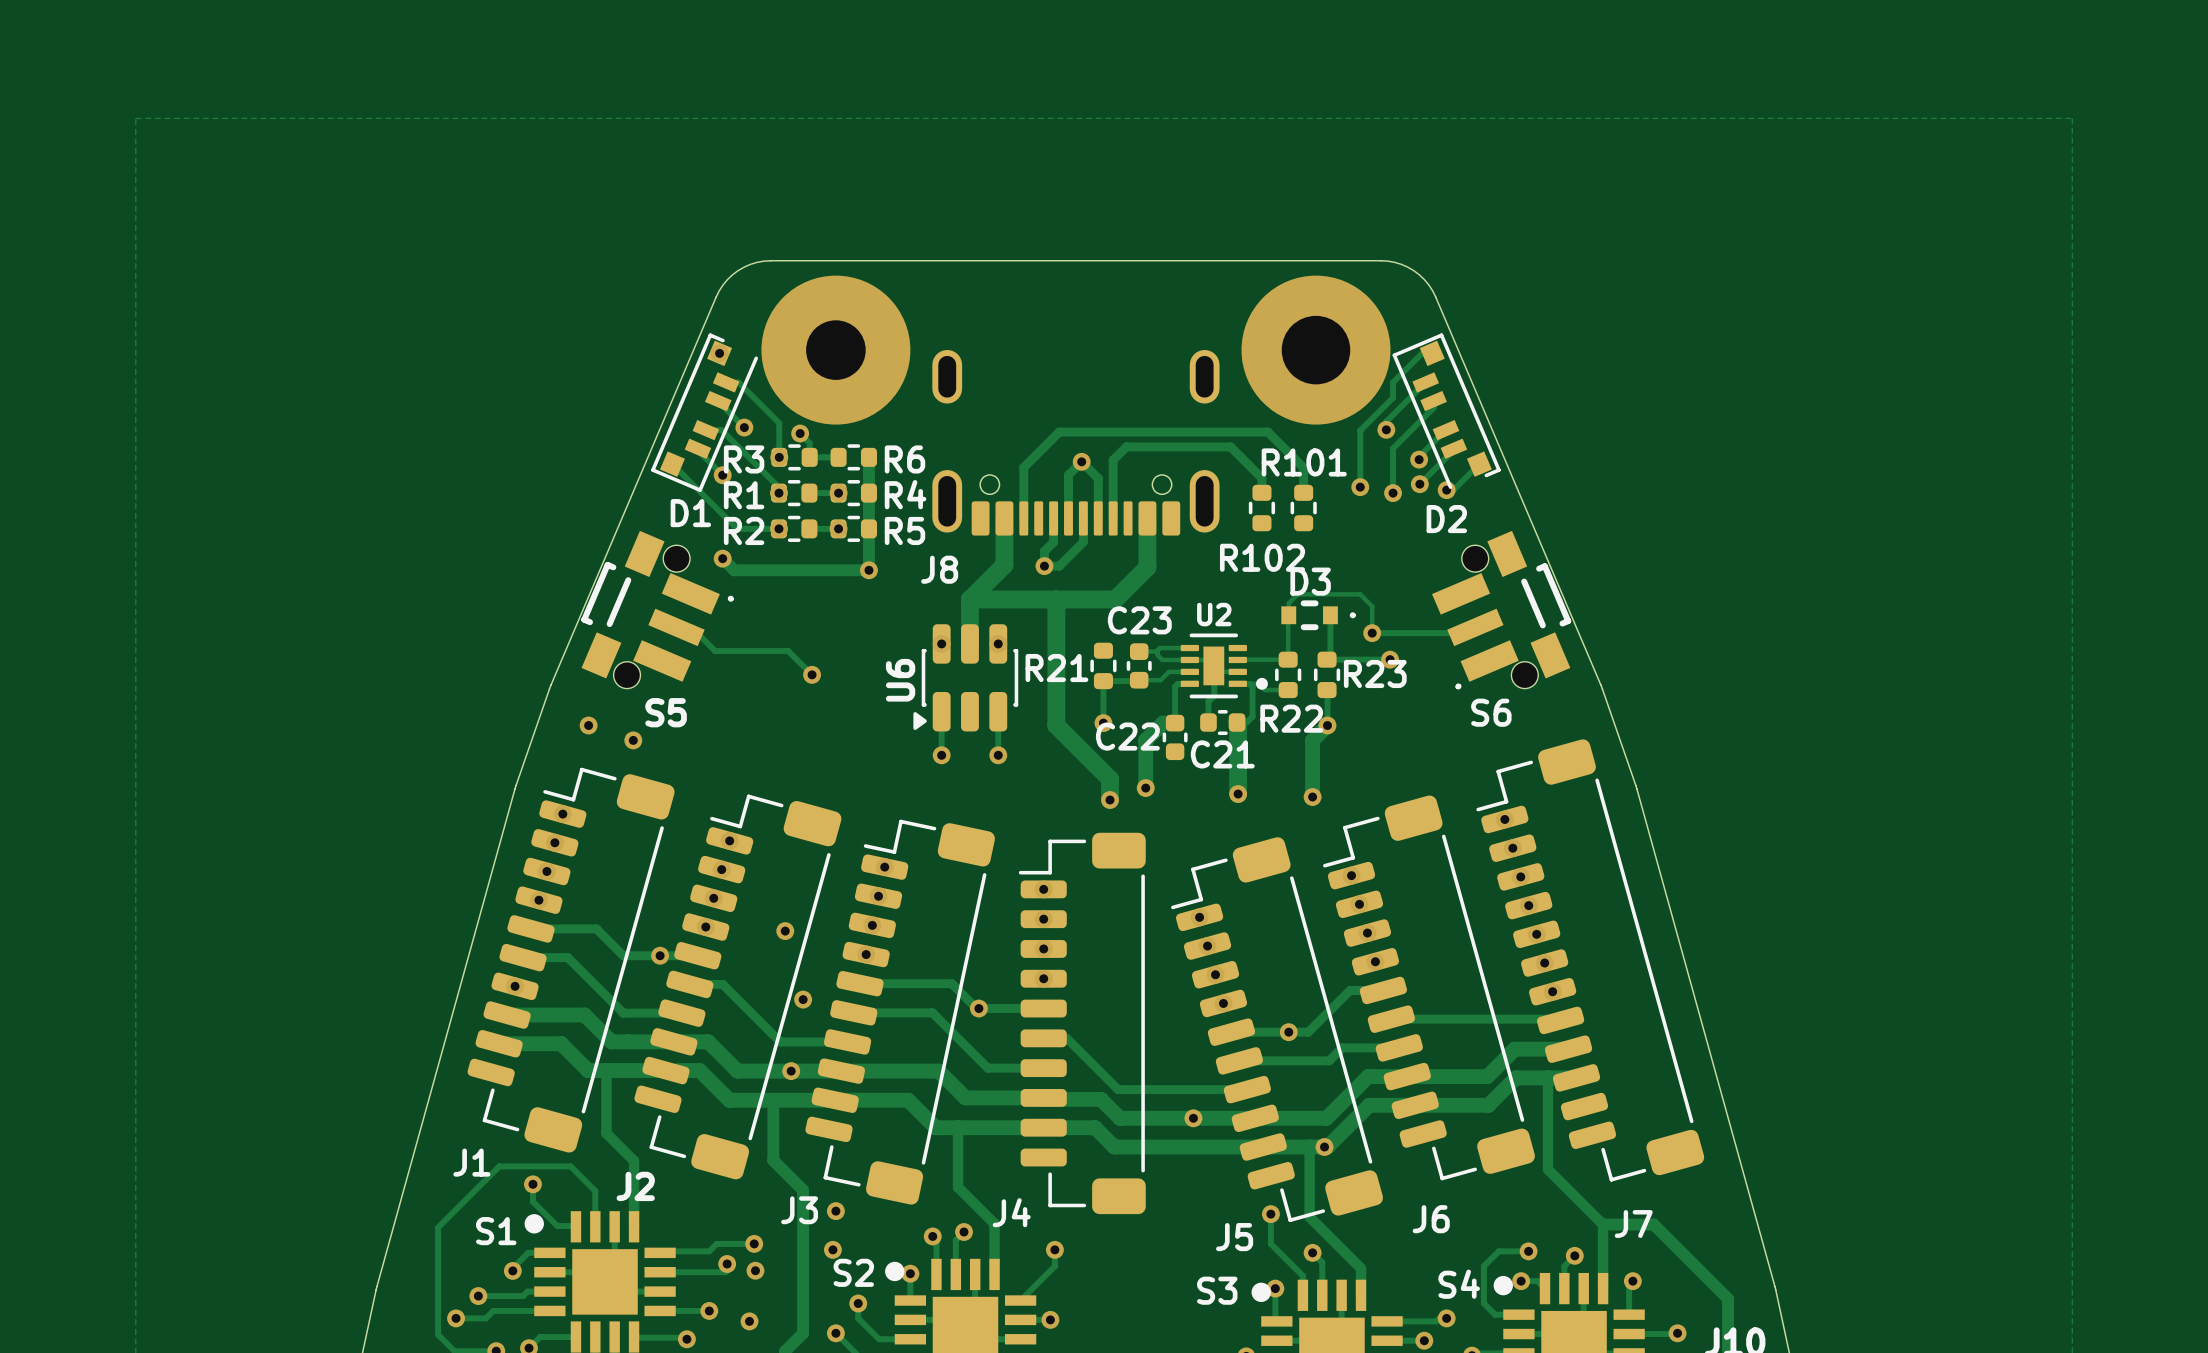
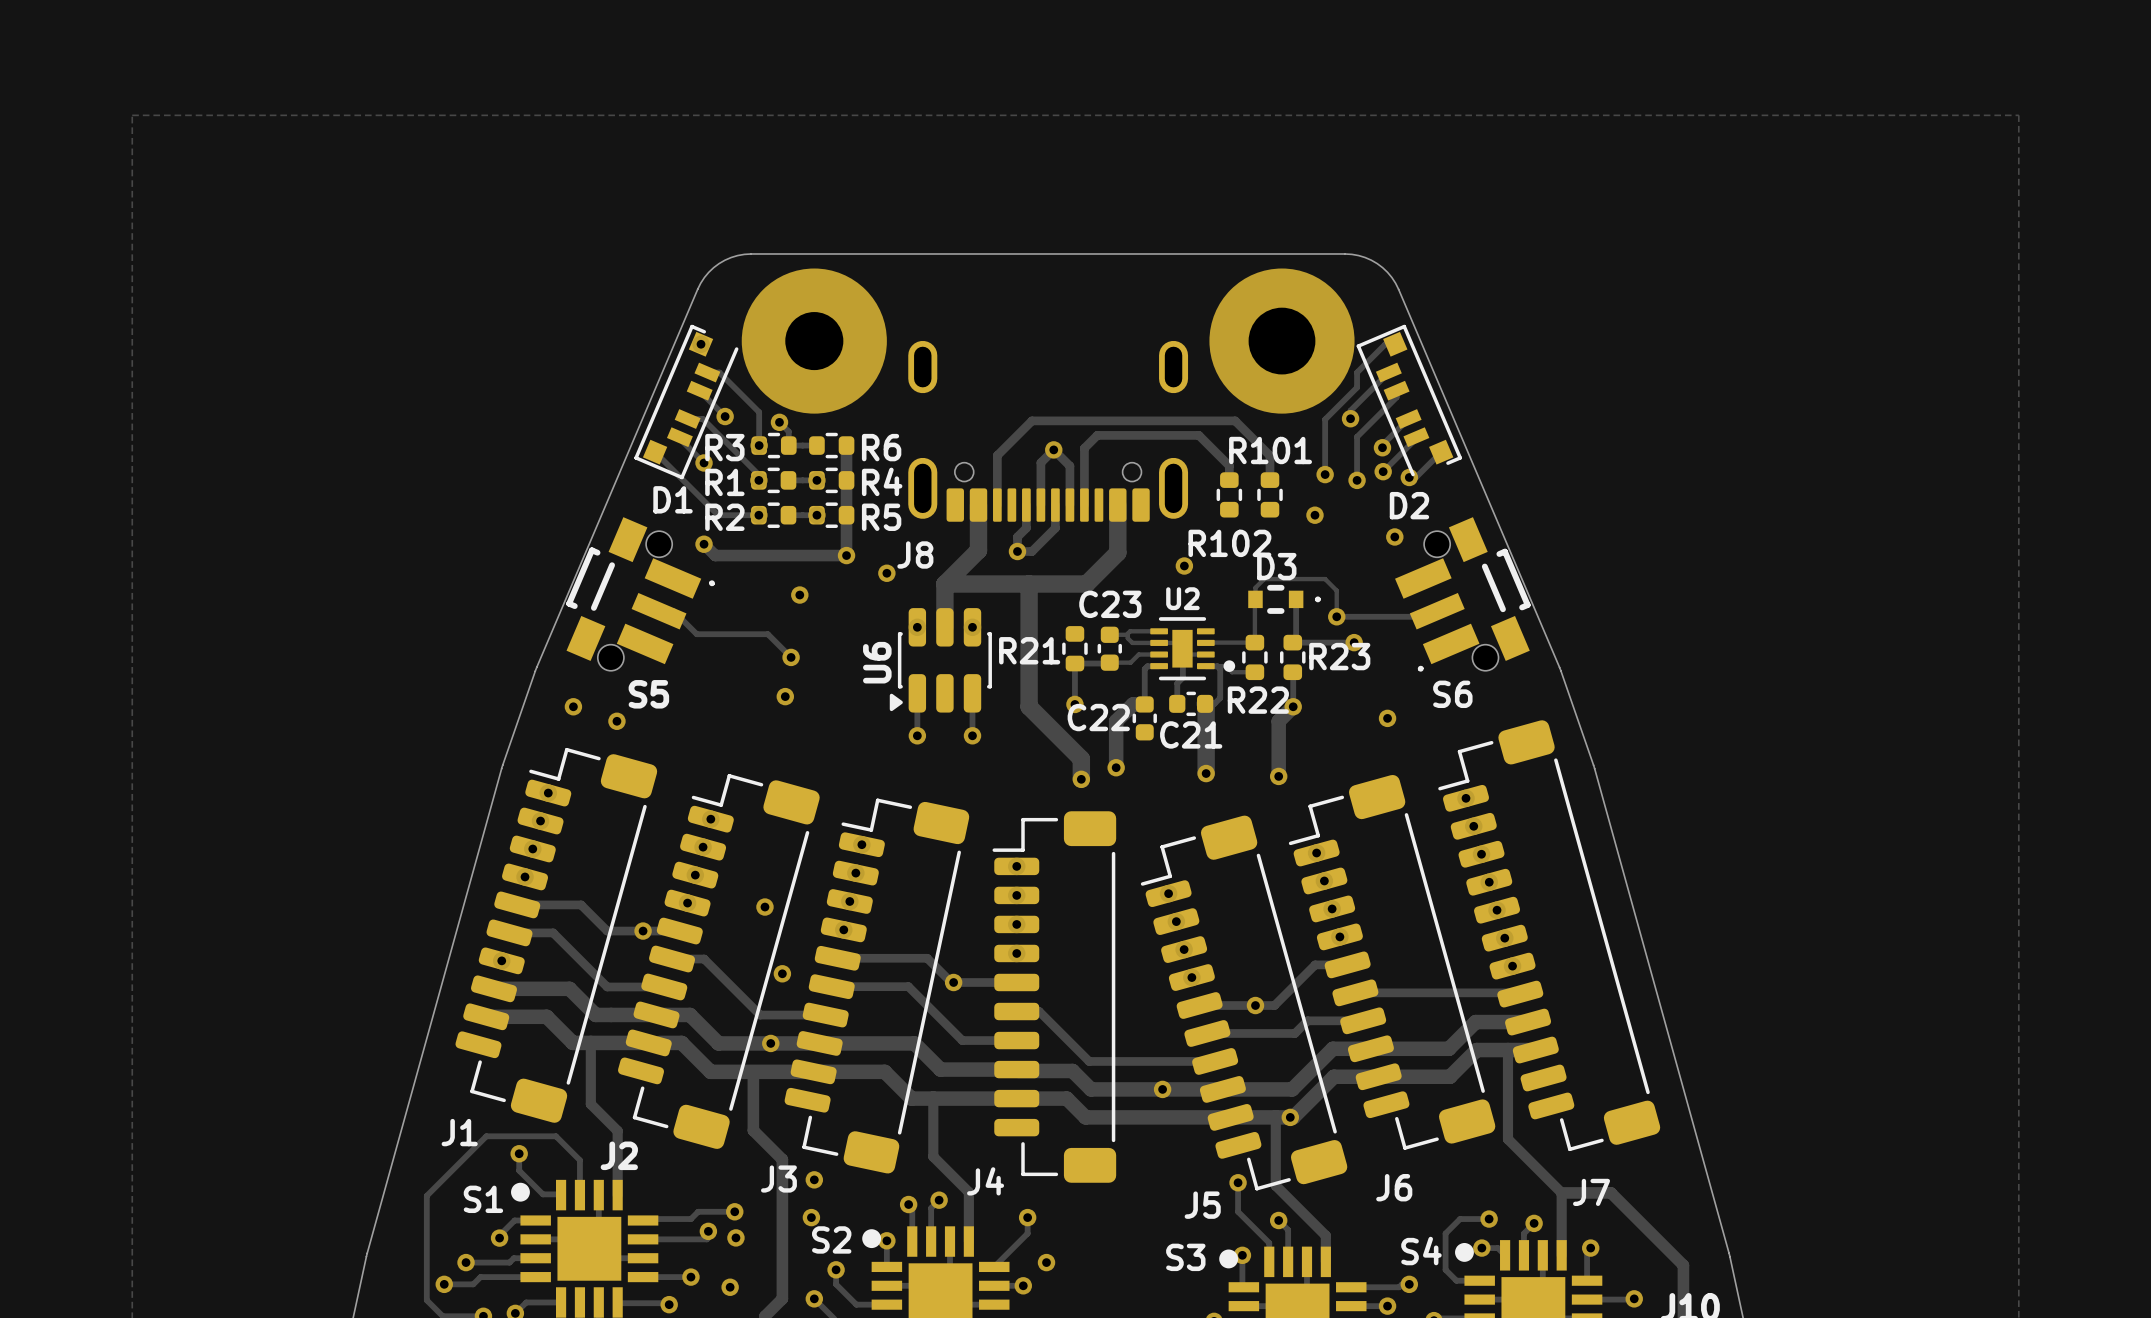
via: none -> (1314, 515)
via: none -> (1394, 536)
via: none -> (1184, 566)
via: none -> (886, 573)
via: none -> (799, 595)
via: none -> (785, 696)
via: none -> (1387, 718)
via: none -> (1046, 1262)

